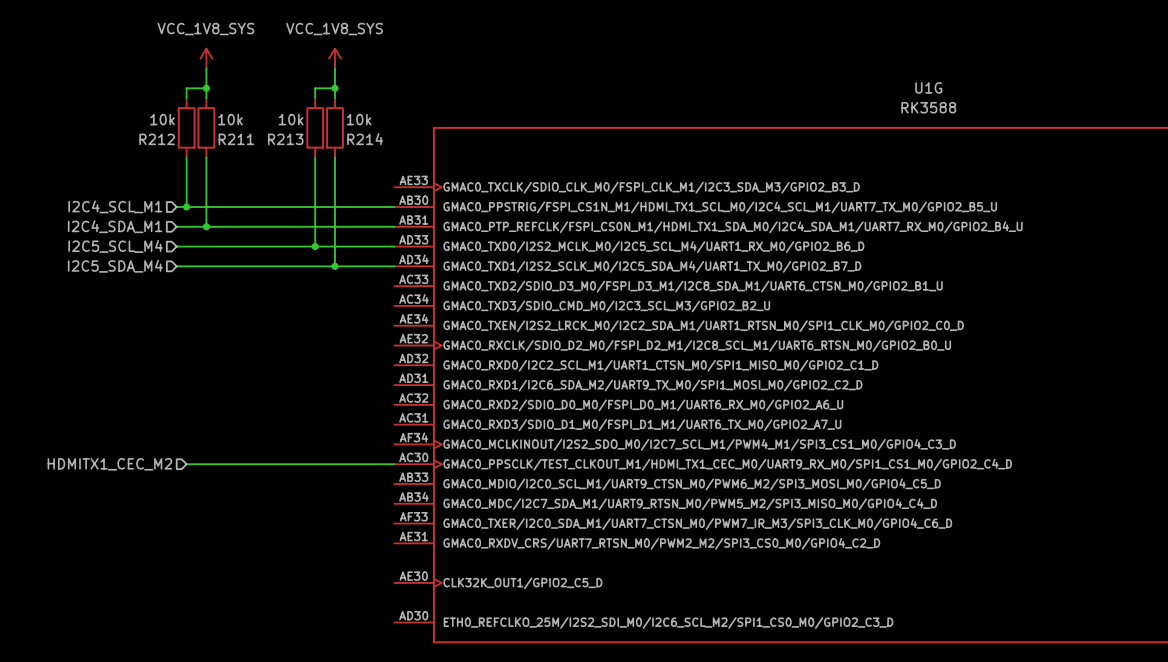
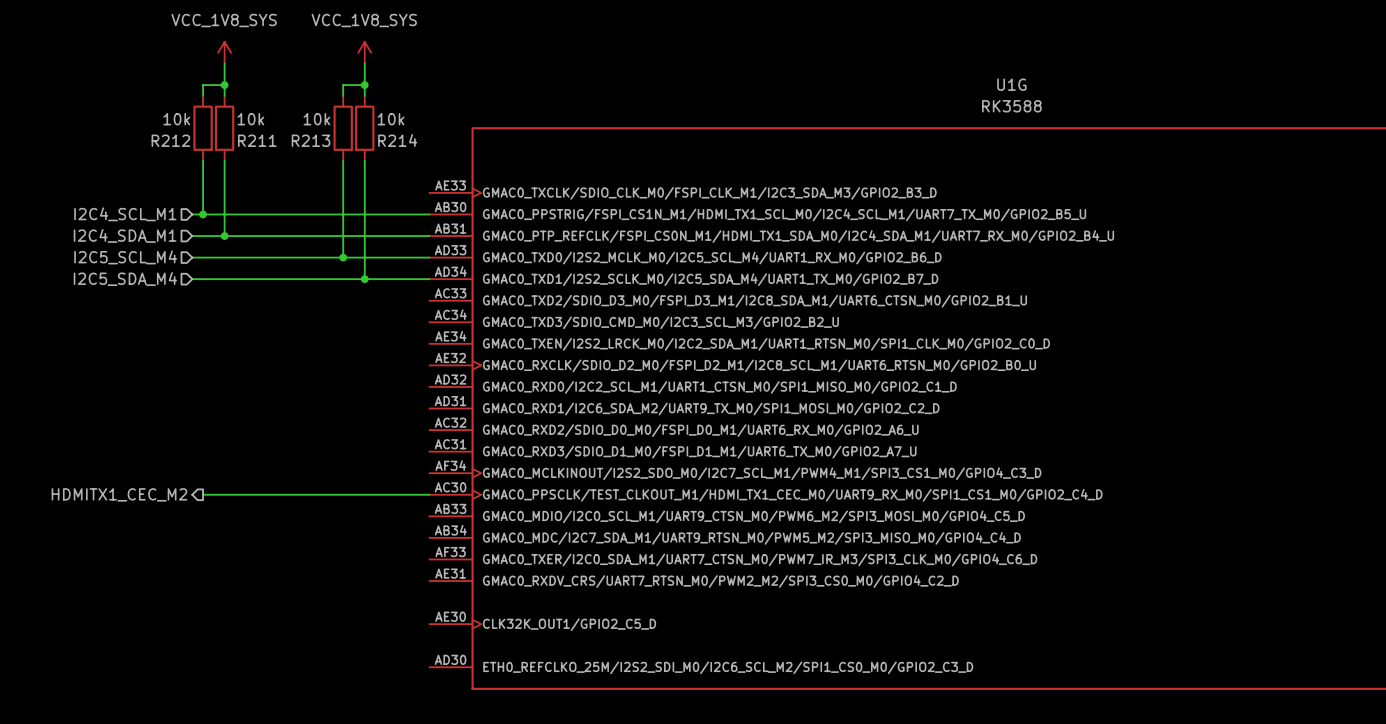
hierarchical label shape: input (109, 464) -> output (119, 494)

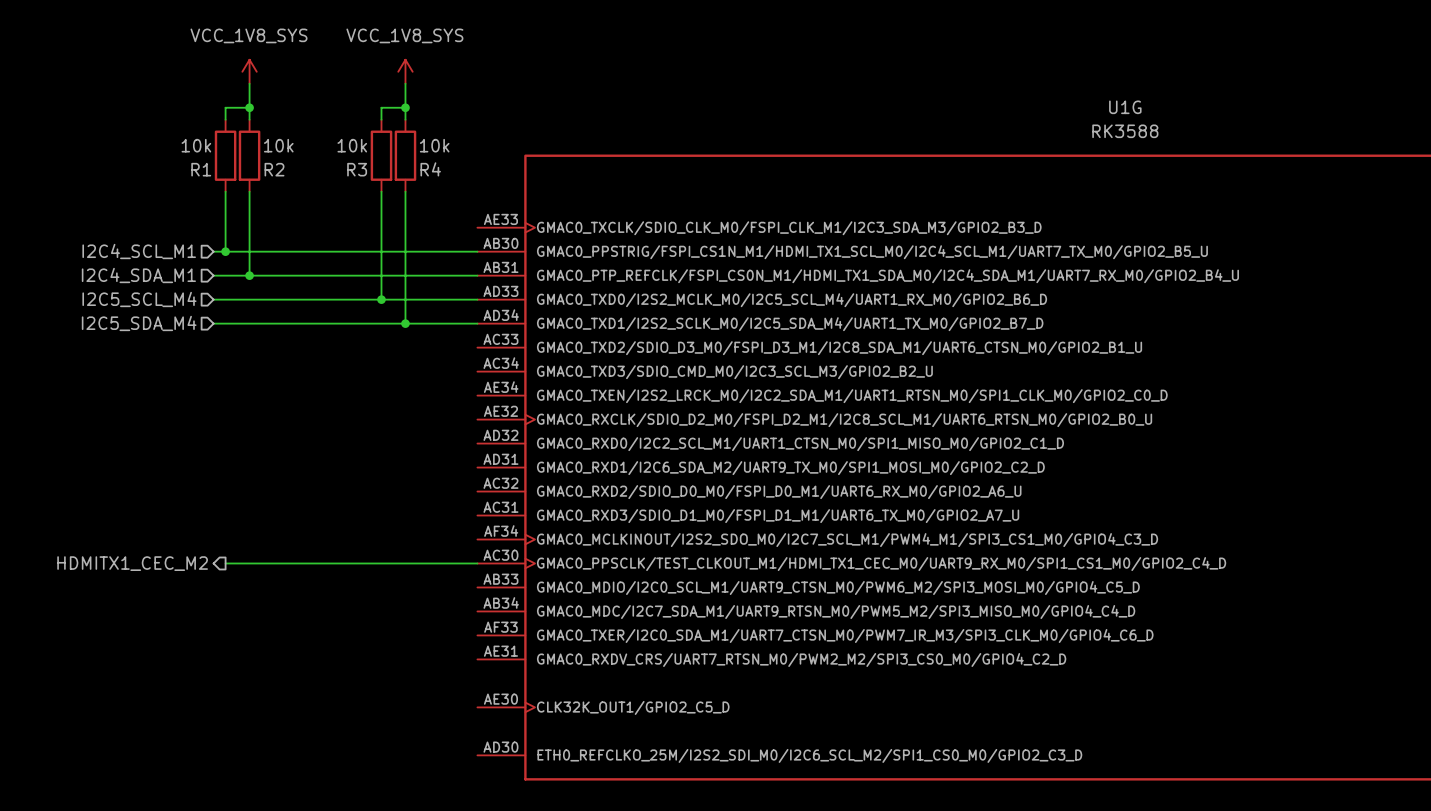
R212 name: R212 (170, 140) -> R1 (201, 169)
R211 name: R211 (257, 140) -> R2 (274, 169)
R213 name: R213 (311, 140) -> R3 (357, 169)
R214 name: R214 (397, 140) -> R4 (430, 169)

